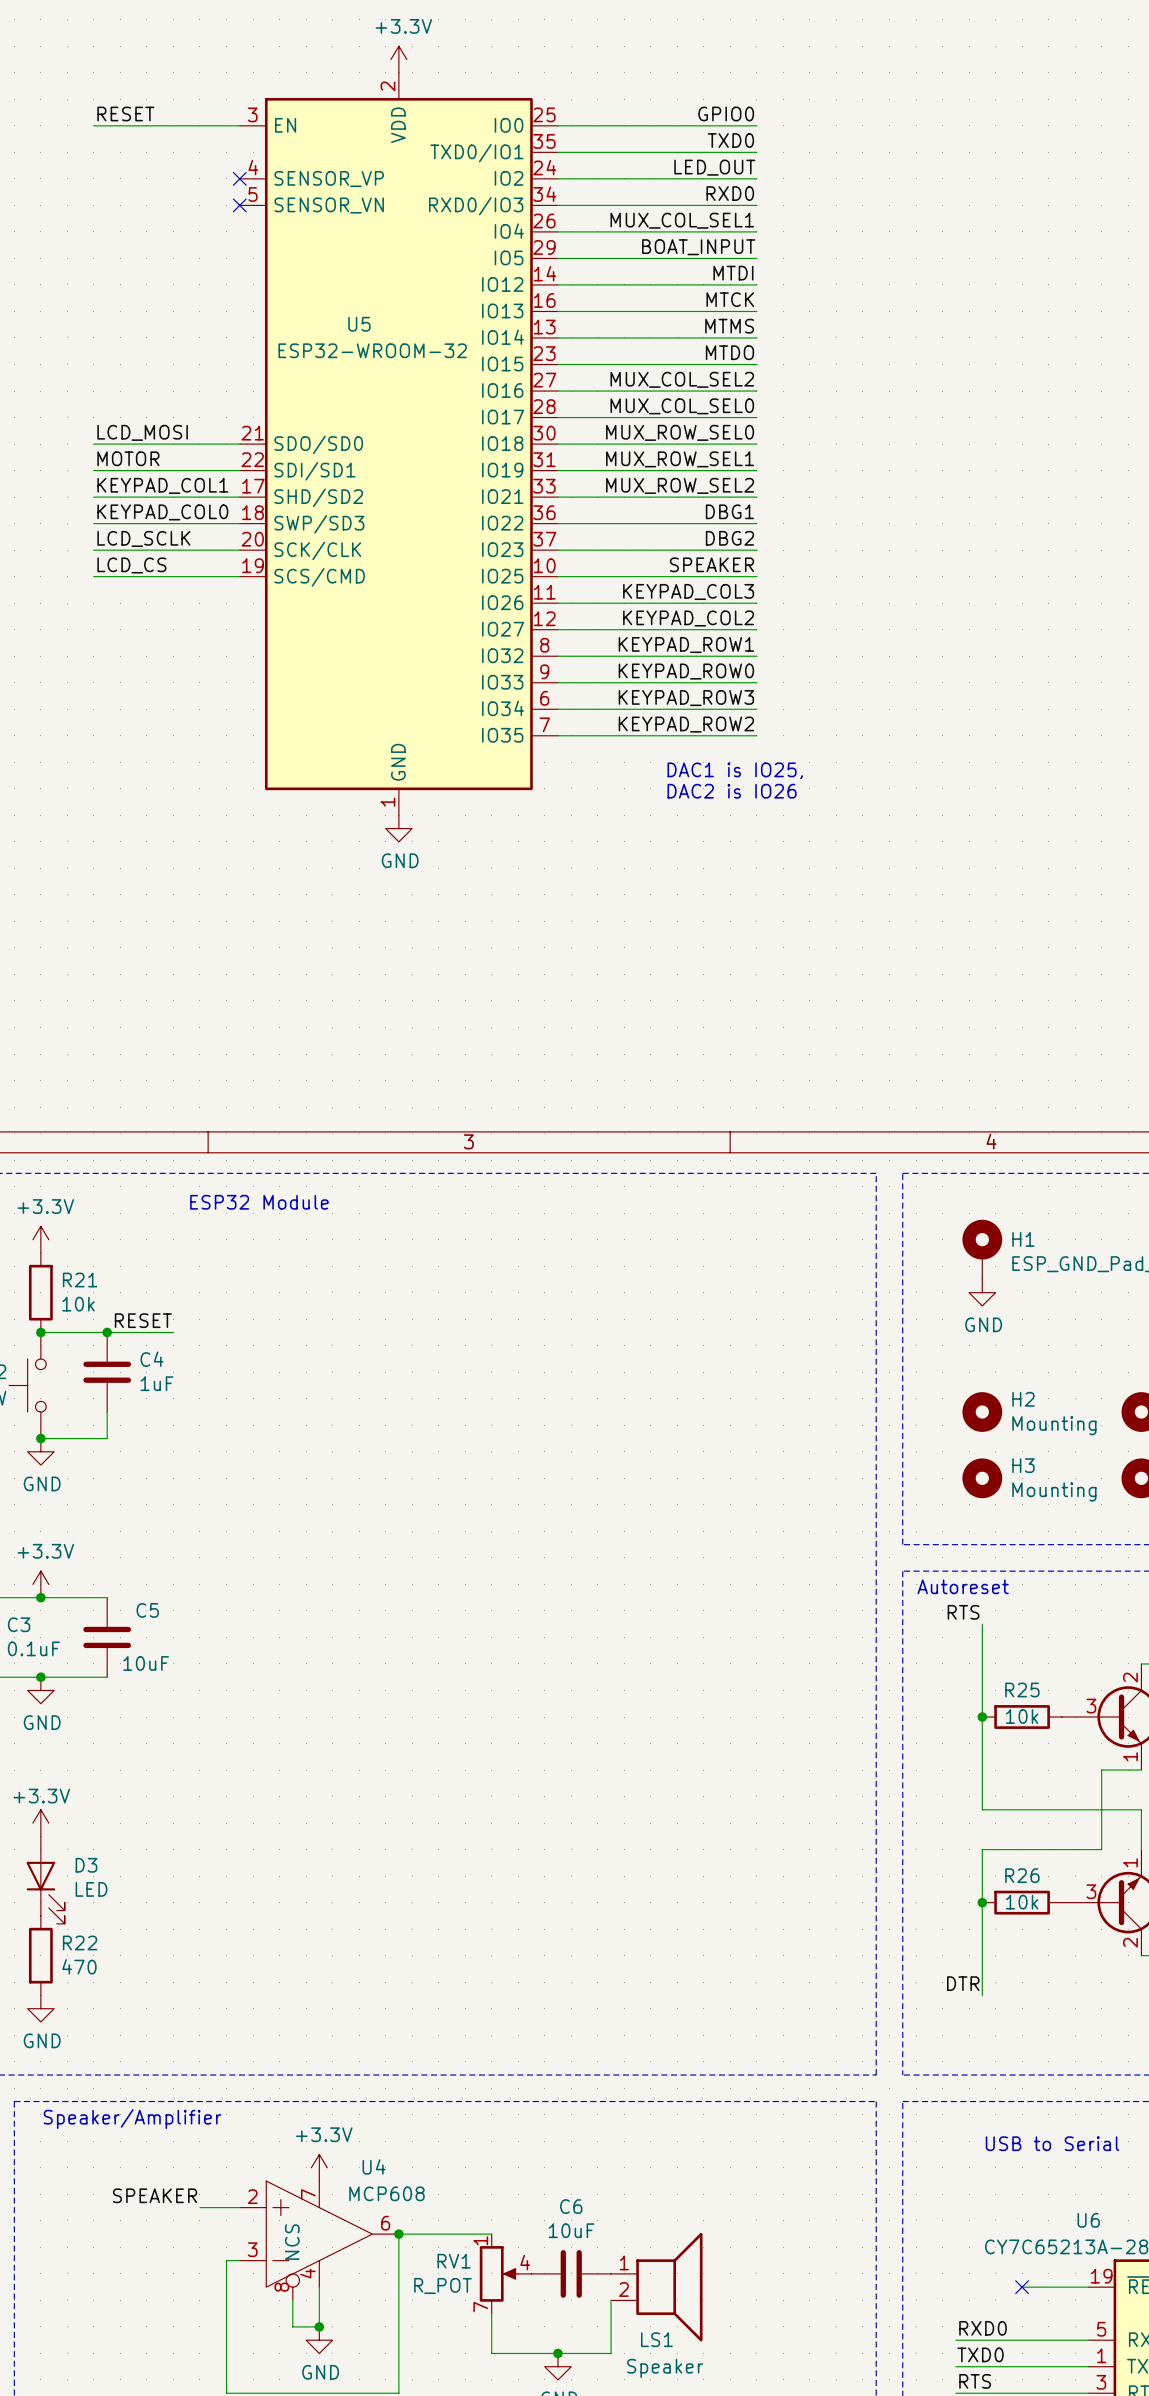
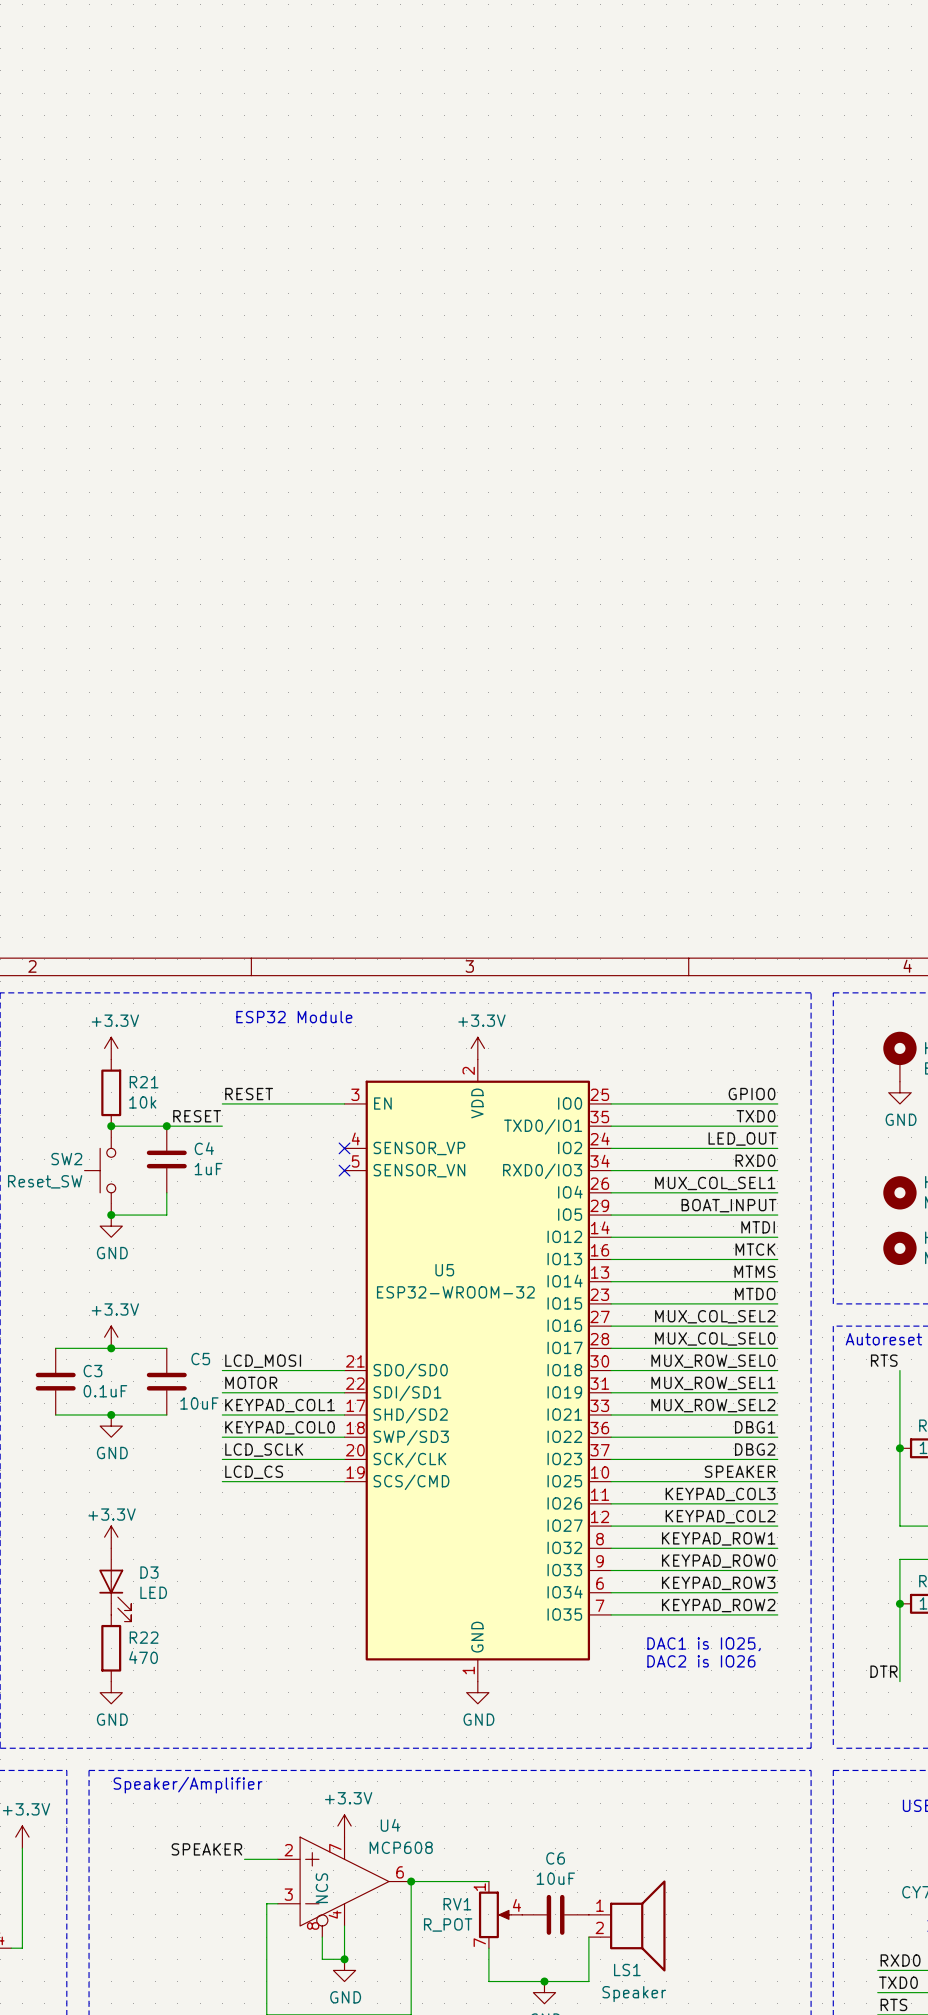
power symbol: +3.3V (398, 59) -> none
label: RESET (125, 114) -> none
label: GPIO0 (726, 114) -> none
wire: (93, 125) (239, 125) -> none
wire: (558, 125) (756, 125) -> none
label: TXD0 (730, 140) -> none
wire: (558, 152) (756, 152) -> none
label: LED_OUT (714, 167) -> none
no-connect mark: (239, 178) -> none
wire: (558, 178) (756, 178) -> none
label: RXD0 (730, 193) -> none
no-connect mark: (239, 205) -> none
wire: (558, 205) (756, 205) -> none
label: MUX_COL_SEL1 (682, 220) -> none
wire: (558, 231) (756, 231) -> none
label: BOAT_INPUT (698, 247) -> none
wire: (558, 258) (756, 258) -> none
label: MTDI (733, 273) -> none
wire: (558, 284) (756, 284) -> none
label: MTCK (730, 299) -> none
wire: (558, 311) (756, 311) -> none
label: MTMS (729, 326) -> none
wire: (558, 337) (756, 337) -> none
label: MTDO (729, 352) -> none
wire: (558, 364) (756, 364) -> none
label: MUX_COL_SEL2 (682, 379) -> none
wire: (558, 391) (756, 391) -> none
label: MUX_COL_SEL0 (682, 406) -> none
wire: (558, 417) (756, 417) -> none
label: LCD_MOSI (142, 432) -> none
label: MUX_ROW_SEL0 (680, 432) -> none
wire: (93, 444) (239, 444) -> none
U5 position: (398, 444) -> (477, 1370)
wire: (558, 444) (756, 444) -> none
label: MOTOR (128, 458) -> none
label: MUX_ROW_SEL1 (680, 459) -> none
wire: (93, 470) (239, 470) -> none
wire: (558, 470) (756, 470) -> none
label: KEYPAD_COL1 (162, 485) -> none
label: MUX_ROW_SEL2 (680, 485) -> none
wire: (93, 497) (239, 497) -> none
wire: (558, 497) (756, 497) -> none
label: DBG1 (729, 511) -> none
label: KEYPAD_COL0 (162, 512) -> none
wire: (93, 523) (239, 523) -> none
wire: (558, 523) (756, 523) -> none
label: LCD_SCLK (143, 538) -> none
label: DBG2 (729, 538) -> none
wire: (93, 550) (239, 550) -> none
wire: (558, 550) (756, 550) -> none
label: SPEAKER (711, 564) -> none
label: LCD_CS (131, 565) -> none
wire: (93, 576) (239, 576) -> none
wire: (558, 576) (756, 576) -> none
label: KEYPAD_COL3 (688, 591) -> none
wire: (558, 603) (756, 603) -> none
label: KEYPAD_COL2 (688, 618) -> none
wire: (558, 629) (756, 629) -> none
label: KEYPAD_ROW1 (686, 645) -> none
wire: (558, 656) (756, 656) -> none
label: KEYPAD_ROW0 (686, 671) -> none
wire: (558, 682) (756, 682) -> none
label: KEYPAD_ROW3 (686, 698) -> none
wire: (558, 709) (756, 709) -> none
label: KEYPAD_ROW2 (686, 724) -> none
wire: (558, 735) (756, 735) -> none
text: DAC1 is IO25, (735, 770) -> none
text: DAC2 is IO26 (732, 791) -> none
power symbol: GND (398, 828) -> none
power symbol: none -> +3.3V (477, 1048)
label: none -> RESET (249, 1094)
label: none -> GPIO0 (752, 1094)
wire: none -> (222, 1103) (344, 1103)
wire: none -> (611, 1103) (777, 1103)
label: none -> TXD0 (755, 1116)
wire: none -> (611, 1126) (777, 1126)
label: none -> LED_OUT (742, 1139)
no-connect mark: none -> (344, 1148)
wire: none -> (611, 1148) (777, 1148)
label: none -> RXD0 (755, 1160)
no-connect mark: none -> (344, 1170)
wire: none -> (611, 1170) (777, 1170)
label: none -> MUX_COL_SEL1 (715, 1183)
wire: none -> (611, 1192) (777, 1192)
label: none -> BOAT_INPUT (729, 1205)
wire: none -> (611, 1215) (777, 1215)
label: none -> MTDI (758, 1227)
wire: none -> (611, 1237) (777, 1237)
label: none -> MTCK (755, 1249)
wire: none -> (611, 1259) (777, 1259)
label: none -> MTMS (754, 1271)
wire: none -> (611, 1281) (777, 1281)
label: none -> MTDO (755, 1293)
wire: none -> (611, 1303) (777, 1303)
label: none -> MUX_COL_SEL2 (715, 1316)
wire: none -> (611, 1326) (777, 1326)
label: none -> MUX_COL_SEL0 (715, 1338)
wire: none -> (611, 1348) (777, 1348)
label: none -> LCD_MOSI (263, 1361)
label: none -> MUX_ROW_SEL0 (713, 1361)
wire: none -> (222, 1370) (344, 1370)
wire: none -> (611, 1370) (777, 1370)
label: none -> MOTOR (251, 1382)
label: none -> MUX_ROW_SEL1 (713, 1383)
wire: none -> (222, 1392) (344, 1392)
wire: none -> (611, 1392) (777, 1392)
label: none -> KEYPAD_COL1 (280, 1405)
label: none -> MUX_ROW_SEL2 (713, 1405)
wire: none -> (222, 1414) (344, 1414)
wire: none -> (611, 1414) (777, 1414)
label: none -> DBG1 (755, 1427)
label: none -> KEYPAD_COL0 (280, 1427)
wire: none -> (222, 1437) (344, 1437)
wire: none -> (611, 1437) (777, 1437)
label: none -> DBG2 (755, 1449)
label: none -> LCD_SCLK (264, 1450)
wire: none -> (222, 1459) (344, 1459)
wire: none -> (611, 1459) (777, 1459)
label: none -> SPEAKER (740, 1471)
label: none -> LCD_CS (254, 1472)
wire: none -> (222, 1481) (344, 1481)
wire: none -> (611, 1481) (777, 1481)
label: none -> KEYPAD_COL3 (720, 1494)
wire: none -> (611, 1503) (777, 1503)
label: none -> KEYPAD_COL2 (720, 1516)
wire: none -> (611, 1526) (777, 1526)
label: none -> KEYPAD_ROW1 (718, 1538)
wire: none -> (611, 1548) (777, 1548)
label: none -> KEYPAD_ROW0 (718, 1561)
wire: none -> (611, 1570) (777, 1570)
label: none -> KEYPAD_ROW3 (718, 1583)
wire: none -> (611, 1592) (777, 1592)
label: none -> KEYPAD_ROW2 (718, 1605)
wire: none -> (611, 1614) (777, 1614)
text: none -> DAC1 is IO25, (704, 1644)
text: none -> DAC2 is IO26 (701, 1661)
power symbol: none -> GND (477, 1692)

